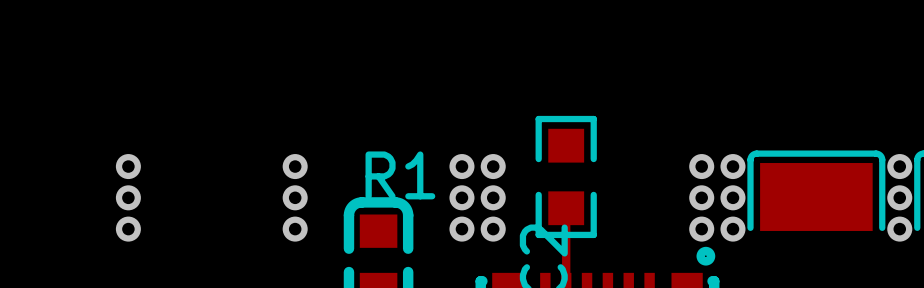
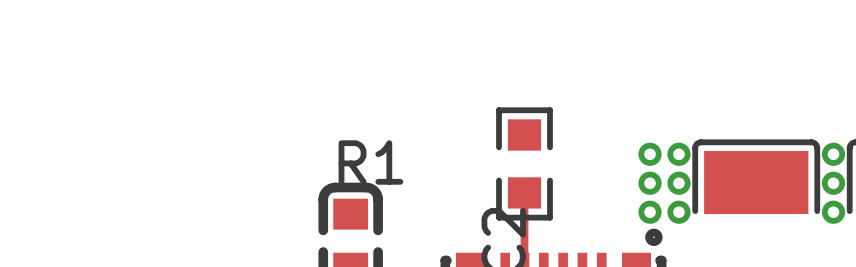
via: (128, 166) -> none
via: (295, 166) -> none
via: (461, 166) -> none
via: (493, 166) -> none
via: (128, 197) -> none
via: (295, 197) -> none
via: (461, 197) -> none
via: (493, 197) -> none
via: (128, 229) -> none
via: (295, 229) -> none
via: (461, 229) -> none
via: (493, 229) -> none

